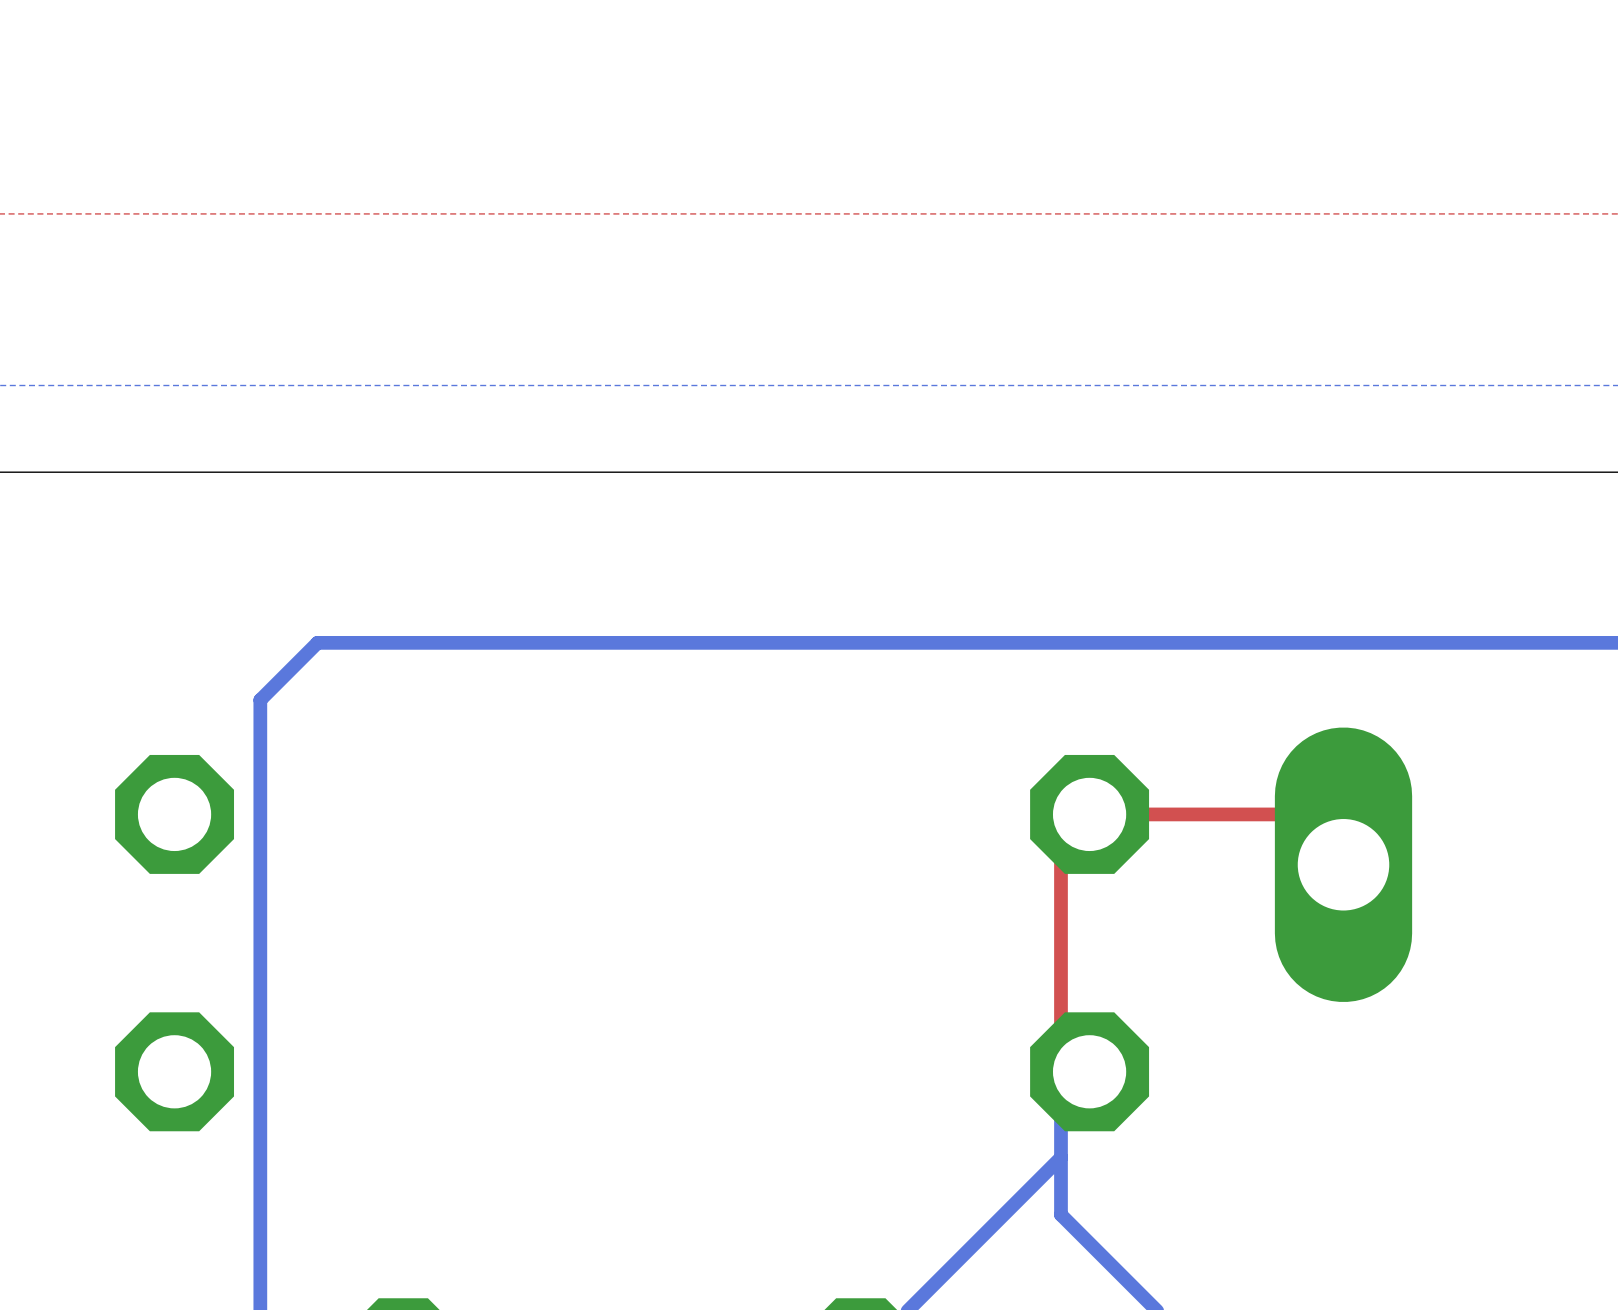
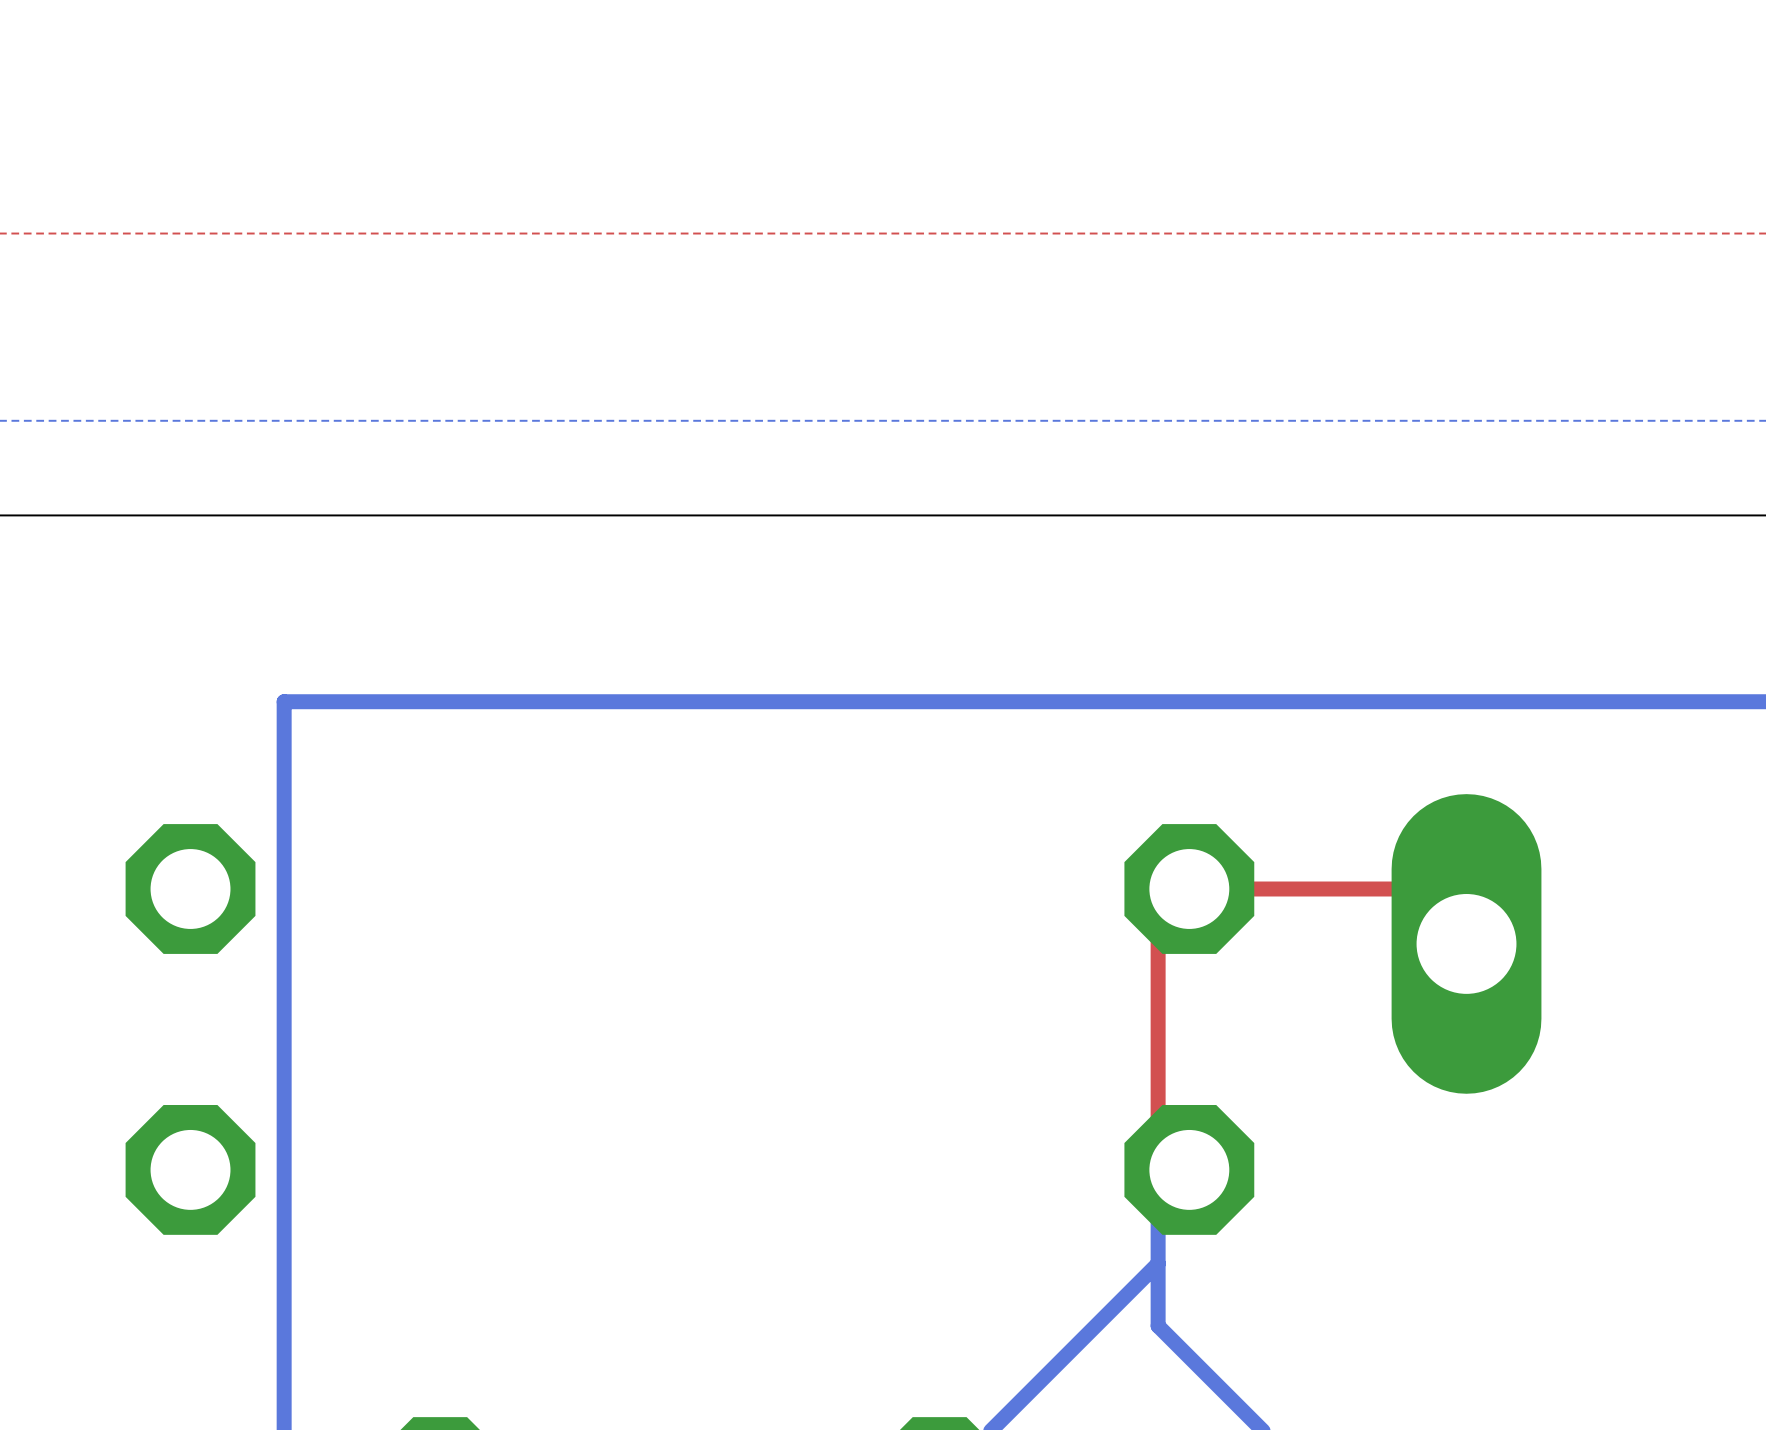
bottom track: (317, 642) (260, 700) -> (346, 701) (284, 701) (284, 764)

